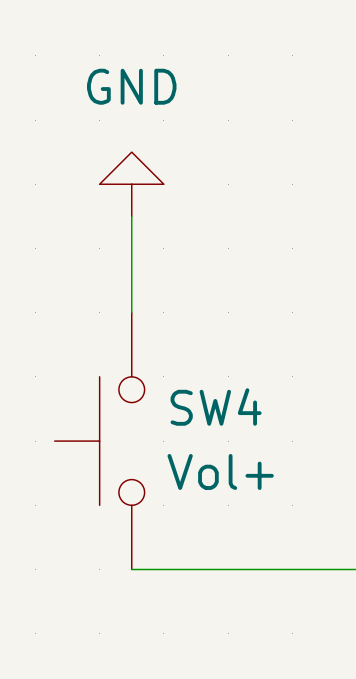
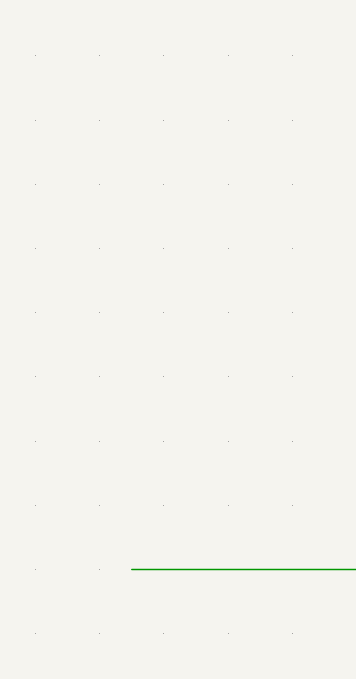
power symbol: GND (131, 184) -> none
wire: (131, 216) (131, 312) -> none
SW4: Vol+ (99, 441) -> none

